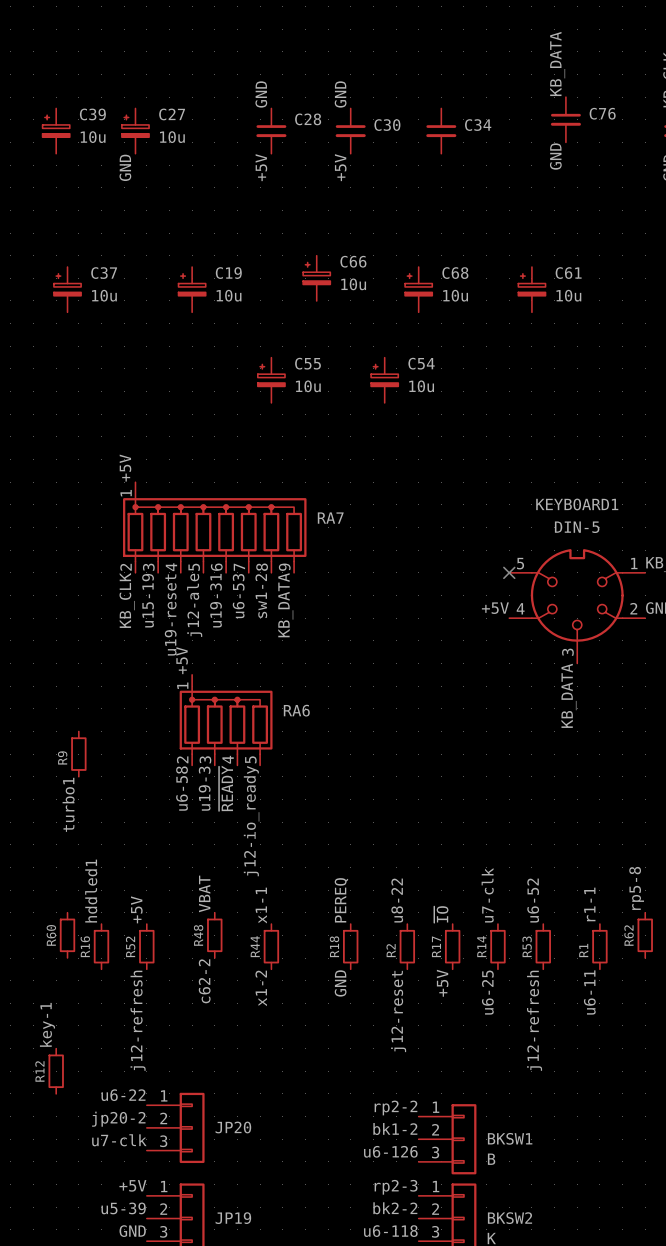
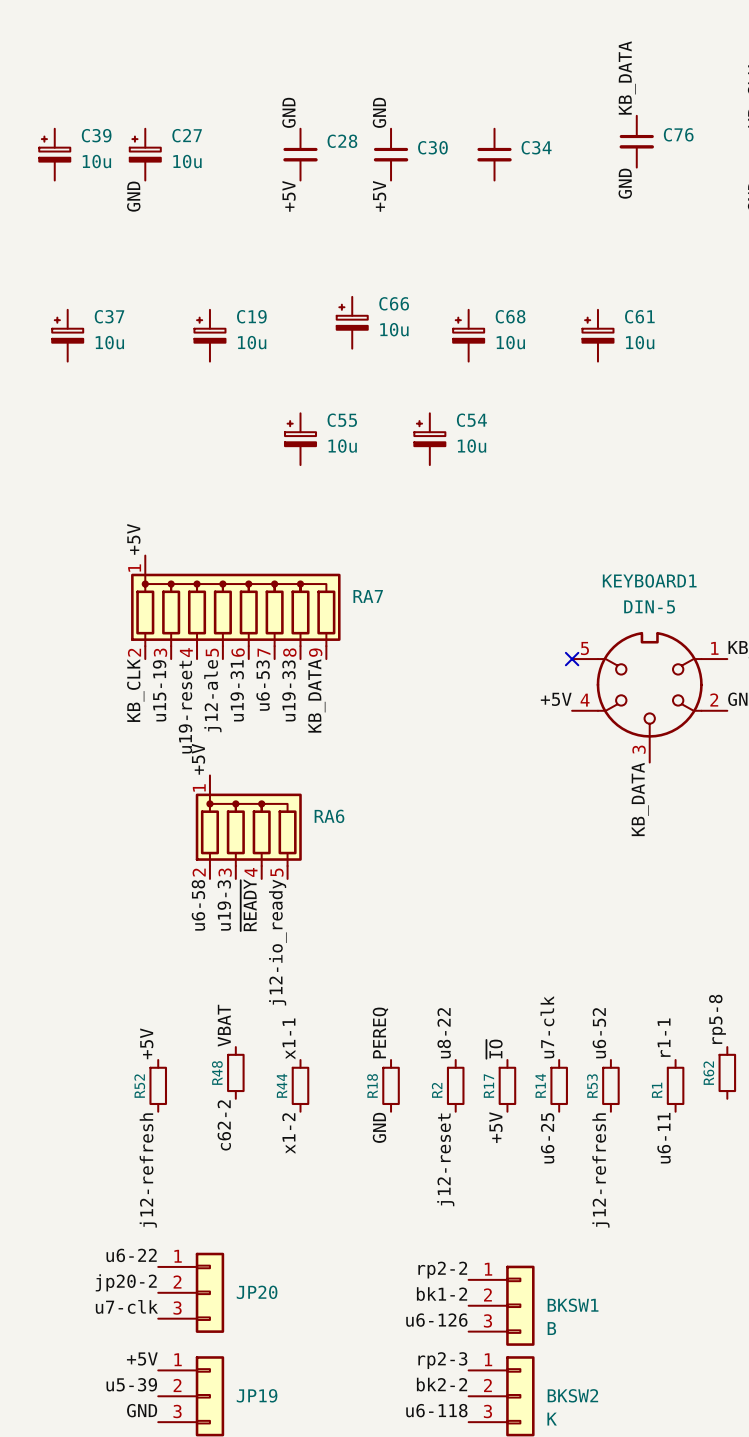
label: sw1-2 (261, 596) -> u19-33 (288, 690)
R9: (78, 754) -> none
label: turbo1 (68, 804) -> none
label: hddled1 (91, 891) -> none
R60: (67, 935) -> none
R16: (101, 946) -> none
label: key-1 (47, 1024) -> none
R12: (56, 1071) -> none

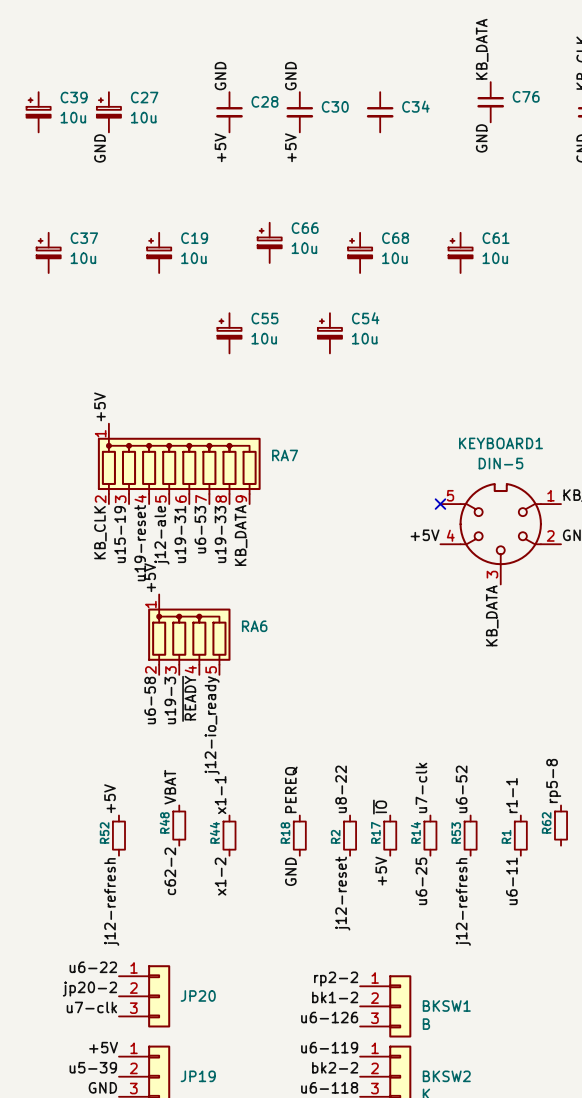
label: rp2-3 (442, 1360) -> u6-119 (329, 1047)

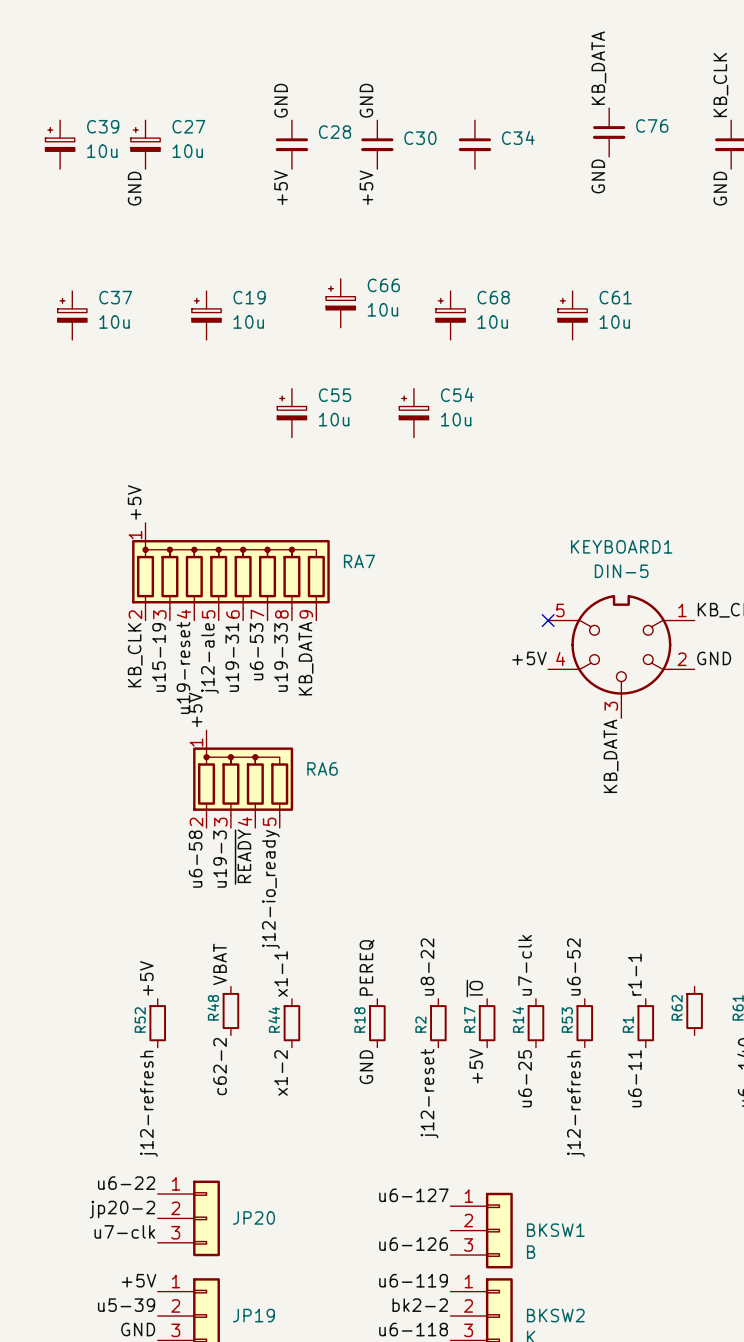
label: rp5-8 (553, 780) -> none
label: rp2-2 (336, 979) -> u6-127 (413, 1195)
label: bk1-2 (335, 997) -> none

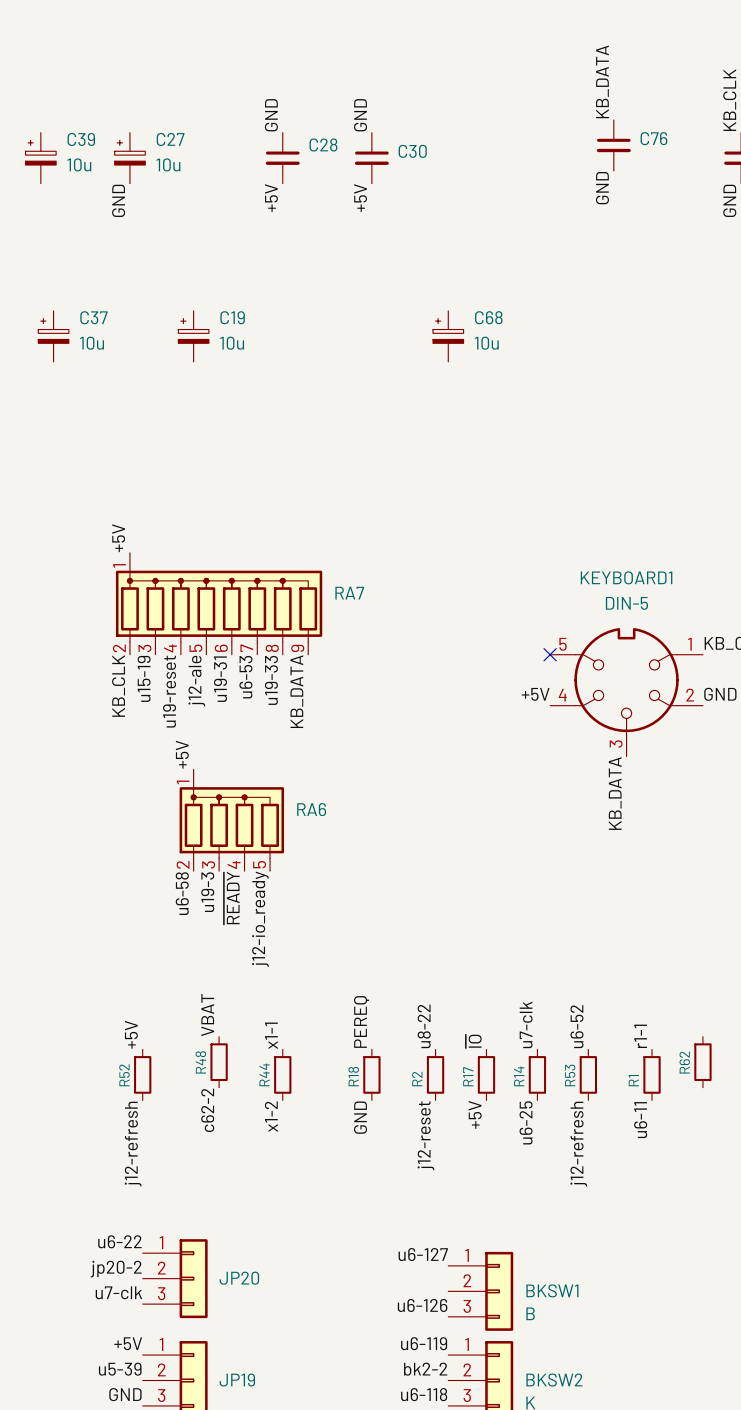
C34: (474, 144) -> none
C66: 10u (340, 303) -> none
C61: 10u (572, 315) -> none
C55: 10u (291, 413) -> none
C54: 10u (413, 413) -> none

